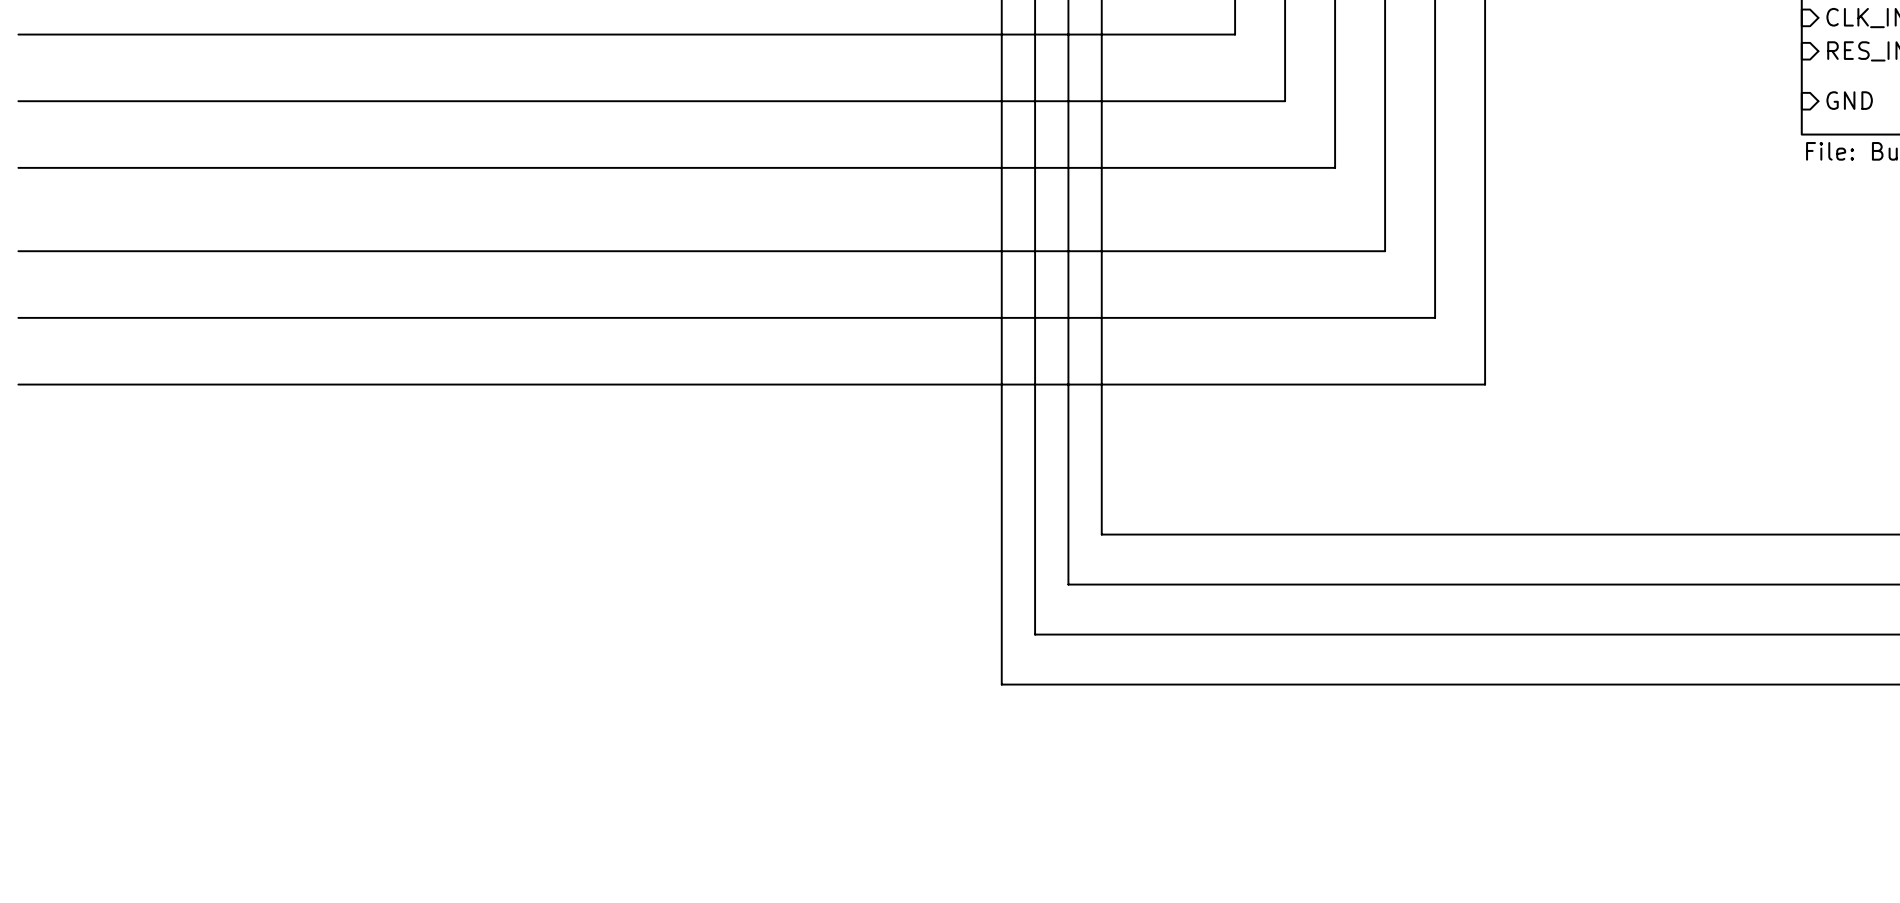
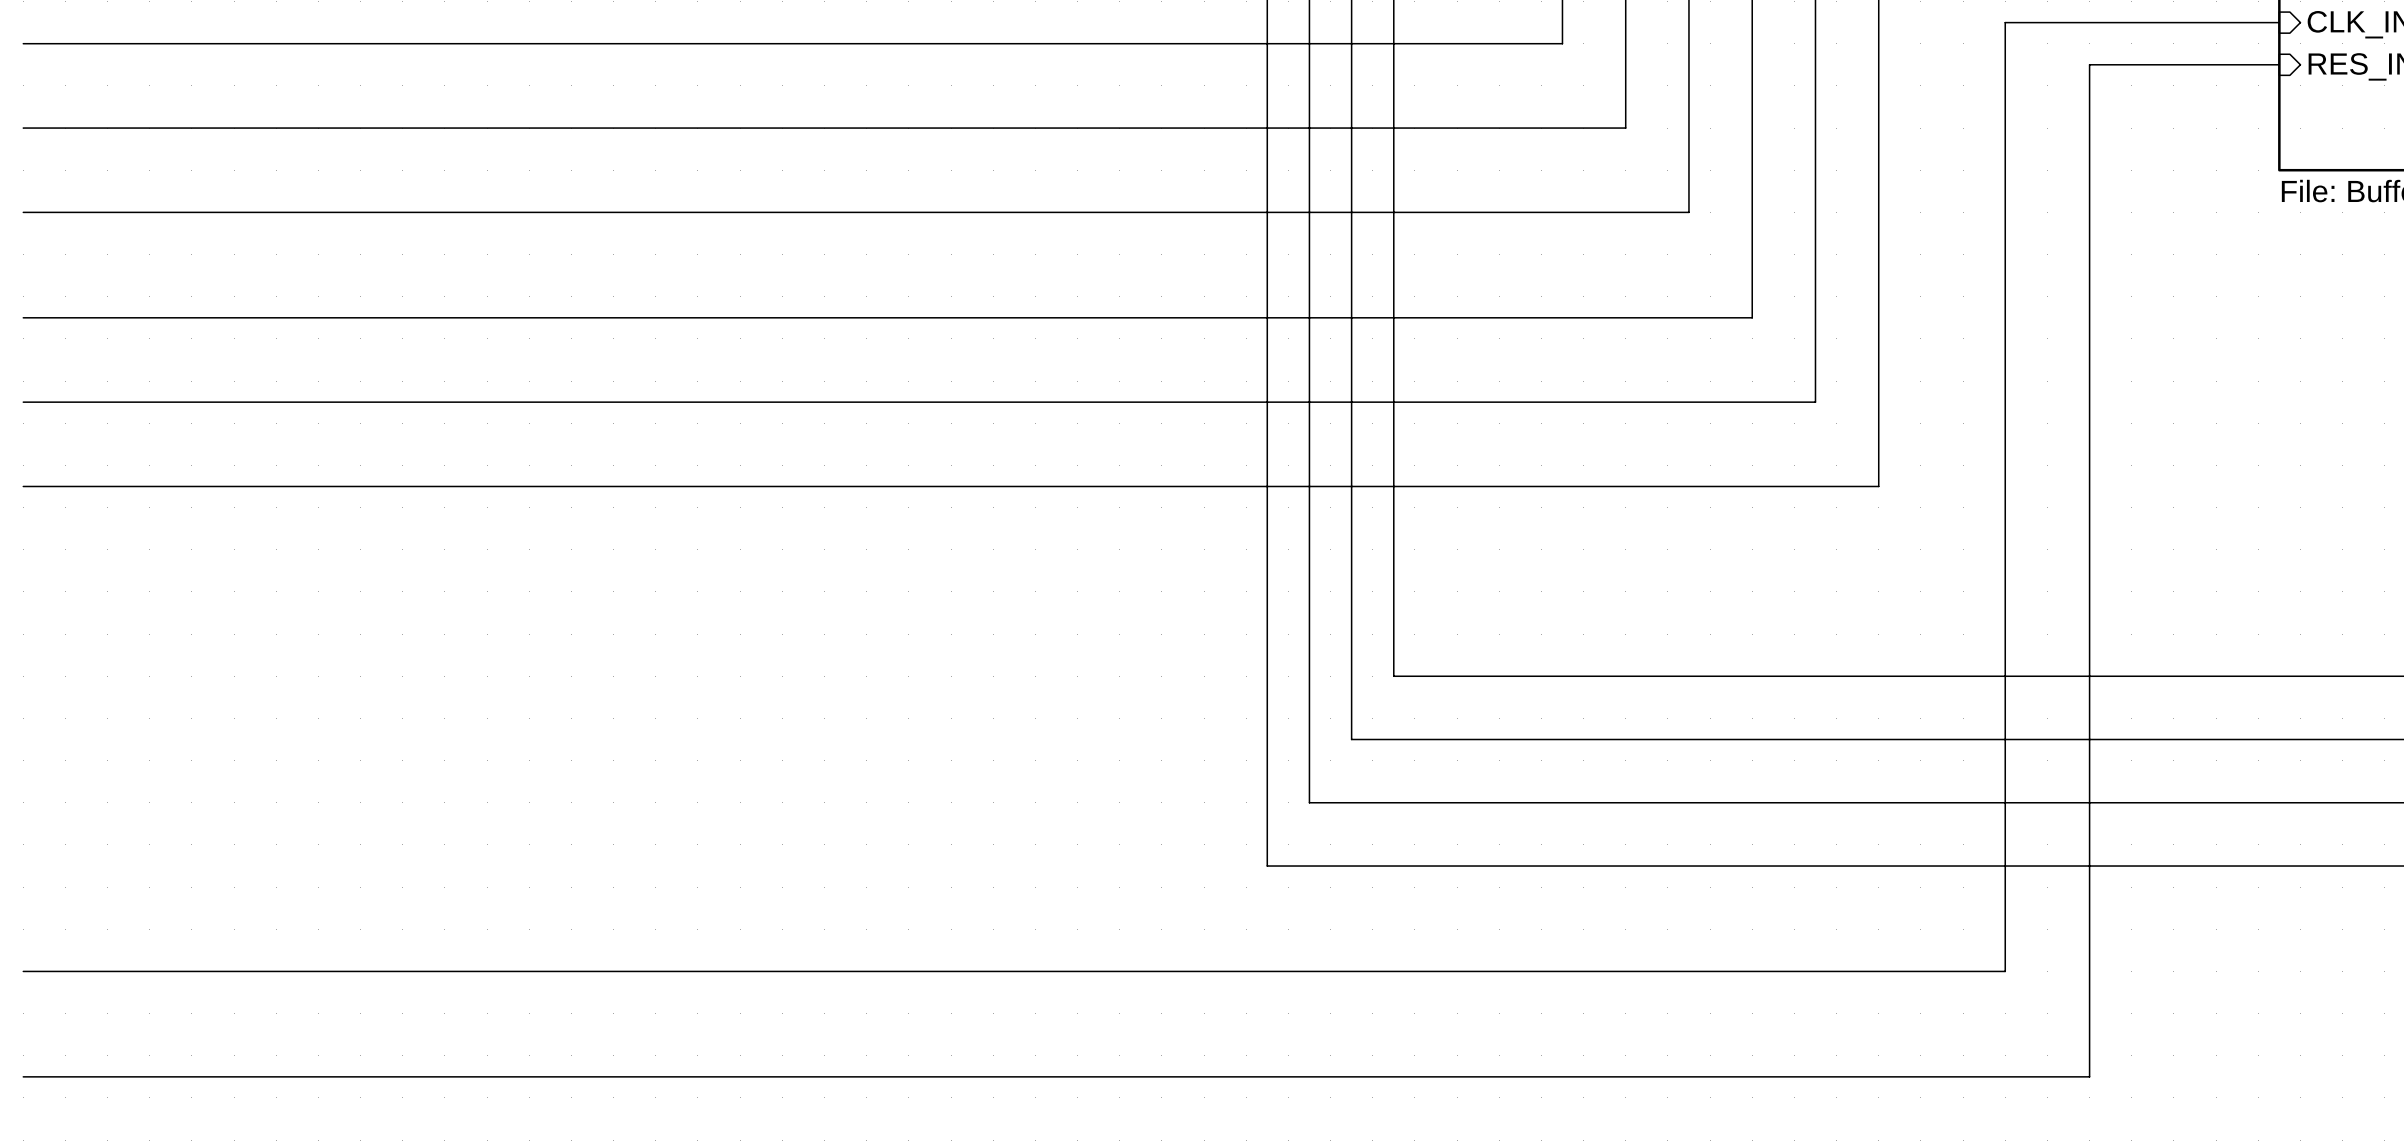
wire: none -> (2279, 22) (2005, 22) (2005, 971) (23, 971)
wire: none -> (2279, 64) (2089, 64) (2089, 1076) (23, 1076)
sheet pin: GND (1849, 100) -> none

